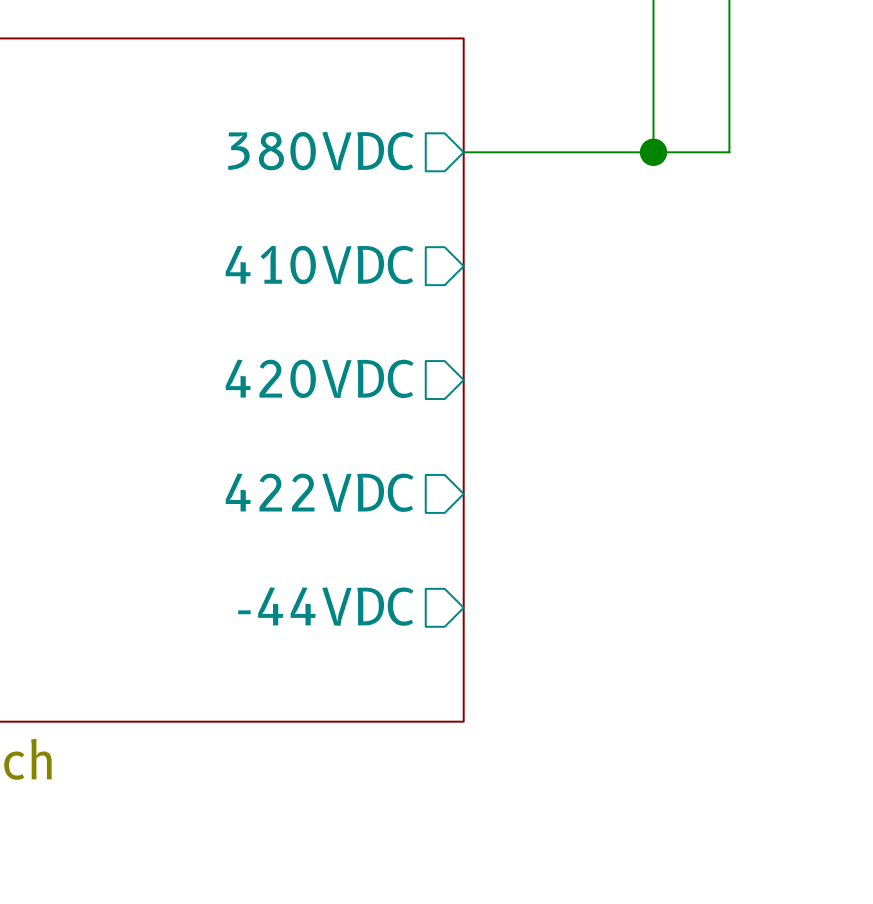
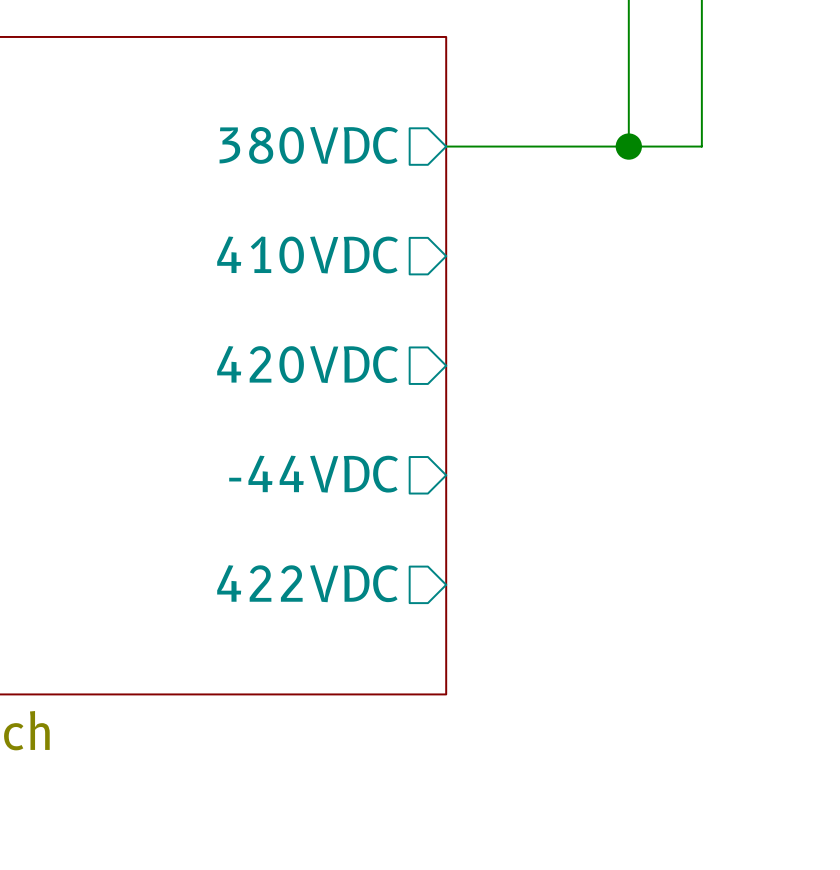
sheet pin: 422VDC (319, 492) -> -44VDC (313, 474)
sheet pin: -44VDC (325, 606) -> 422VDC (307, 583)

